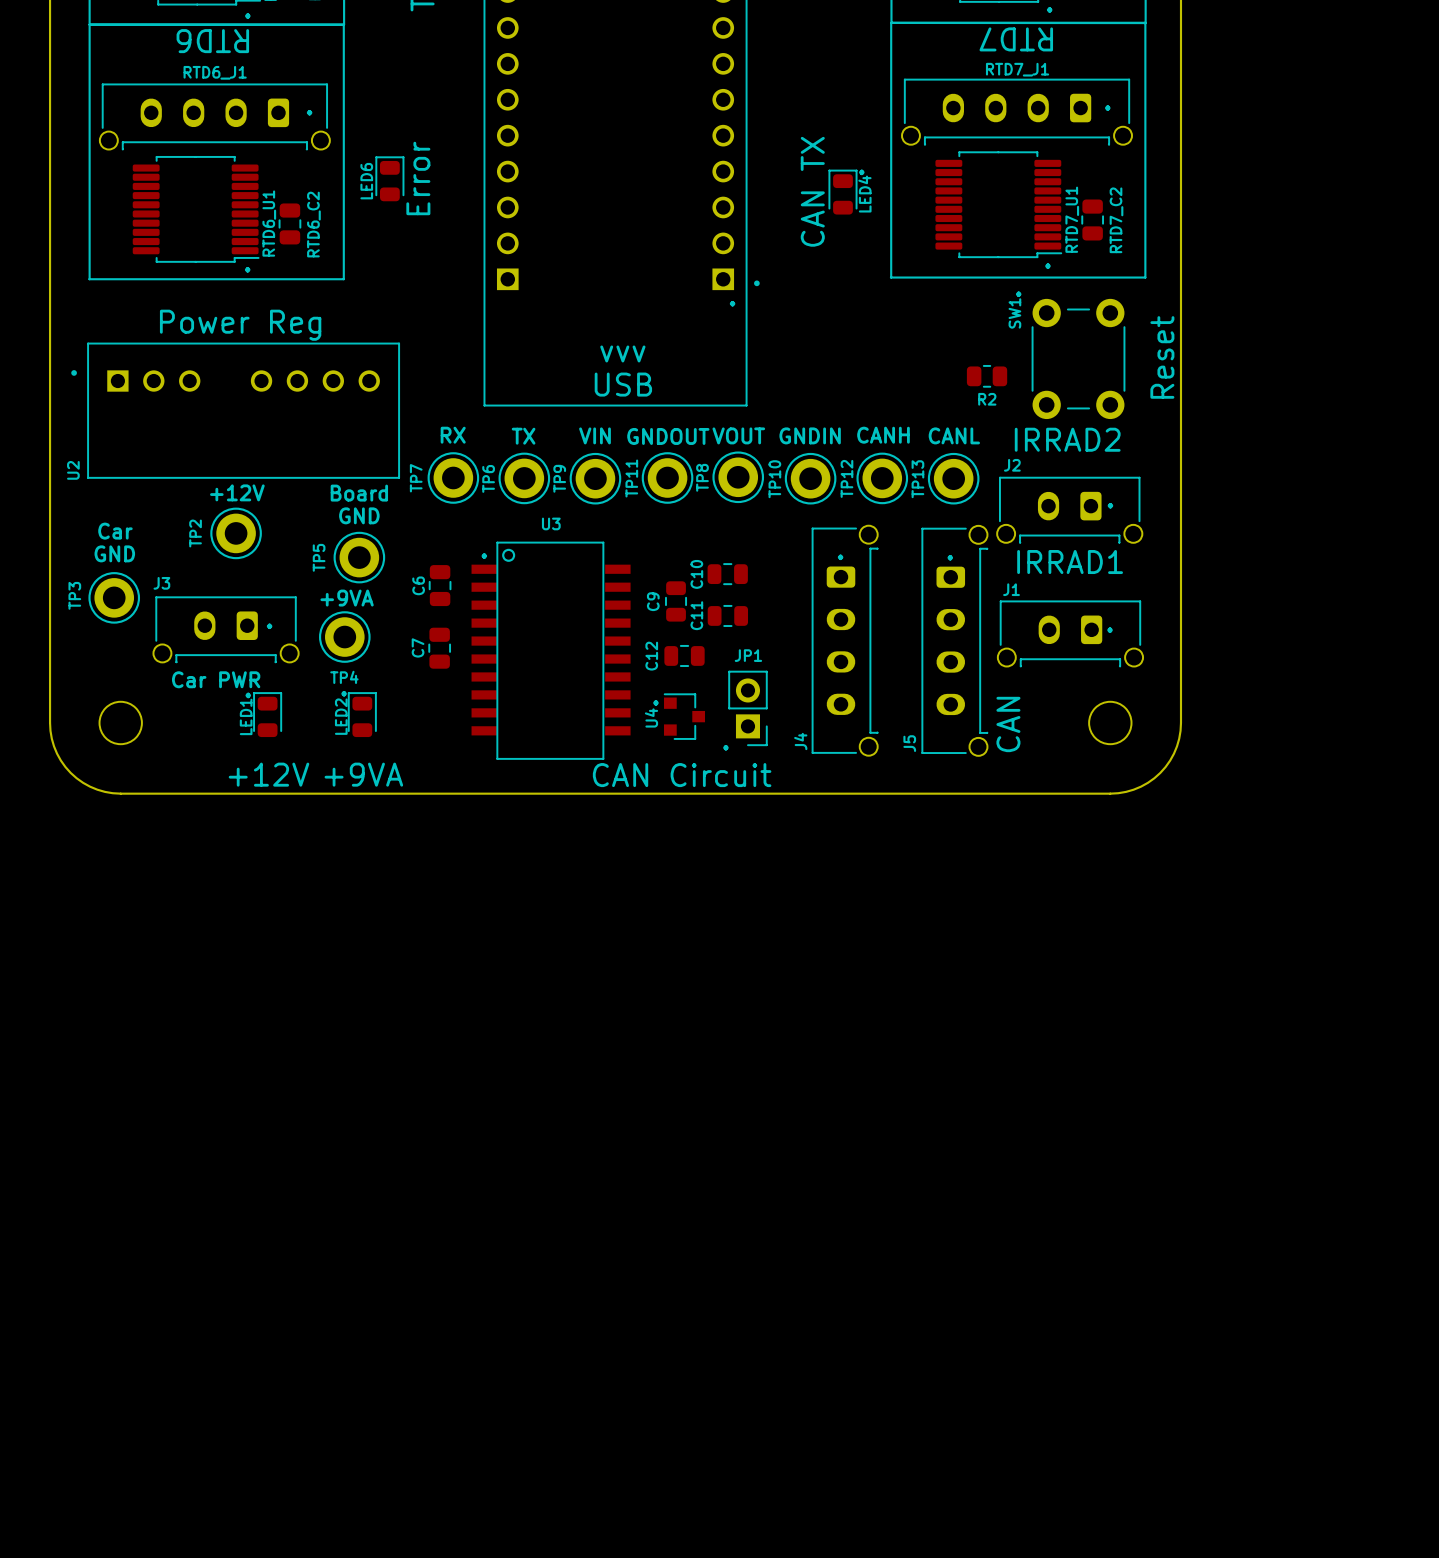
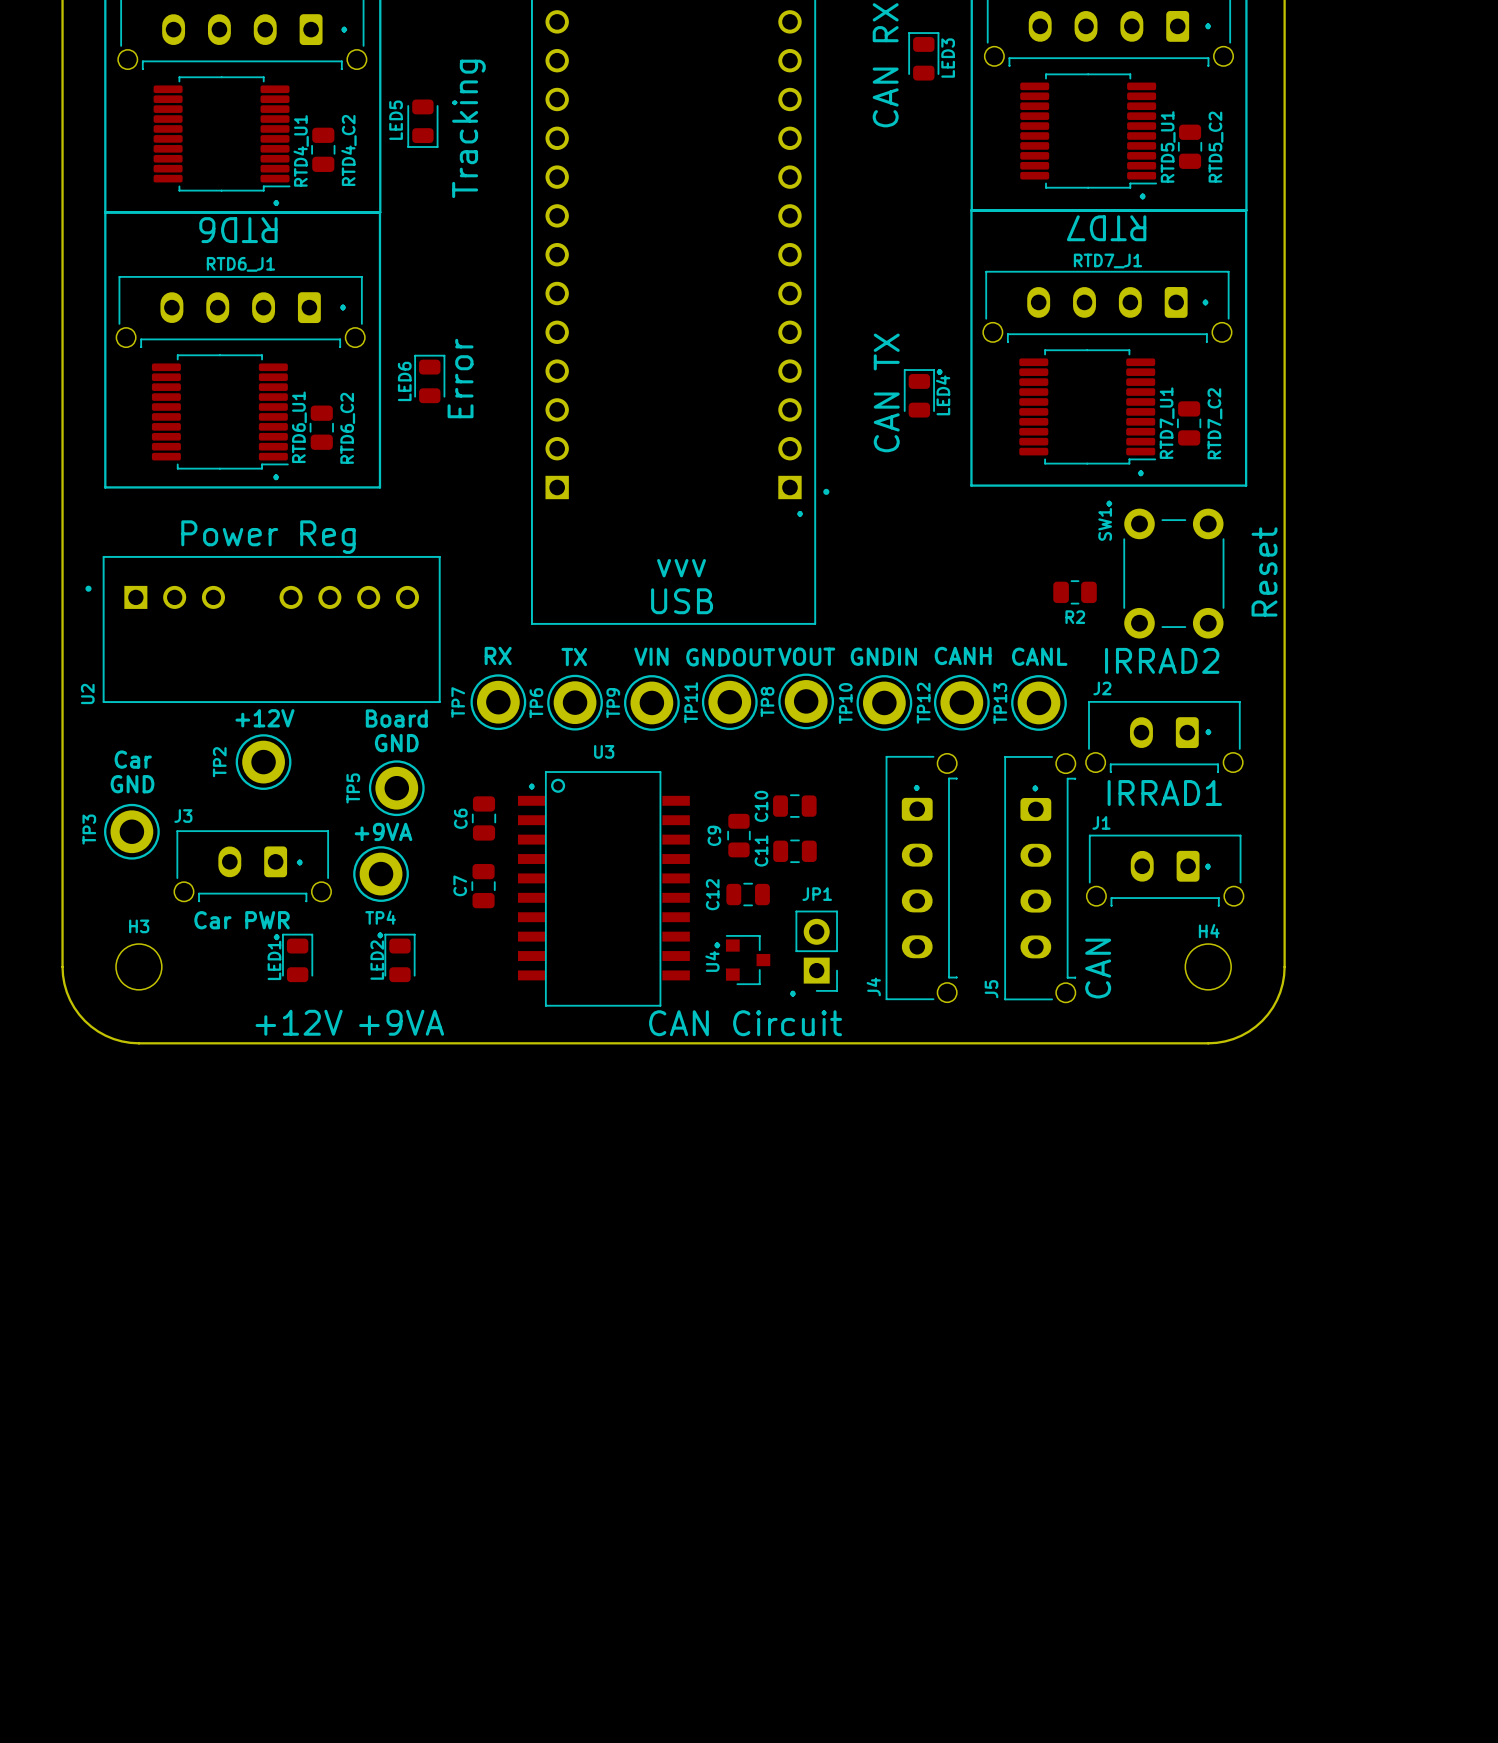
H3 name: none -> H3 (139, 926)
H4 name: none -> H4 (1209, 931)

